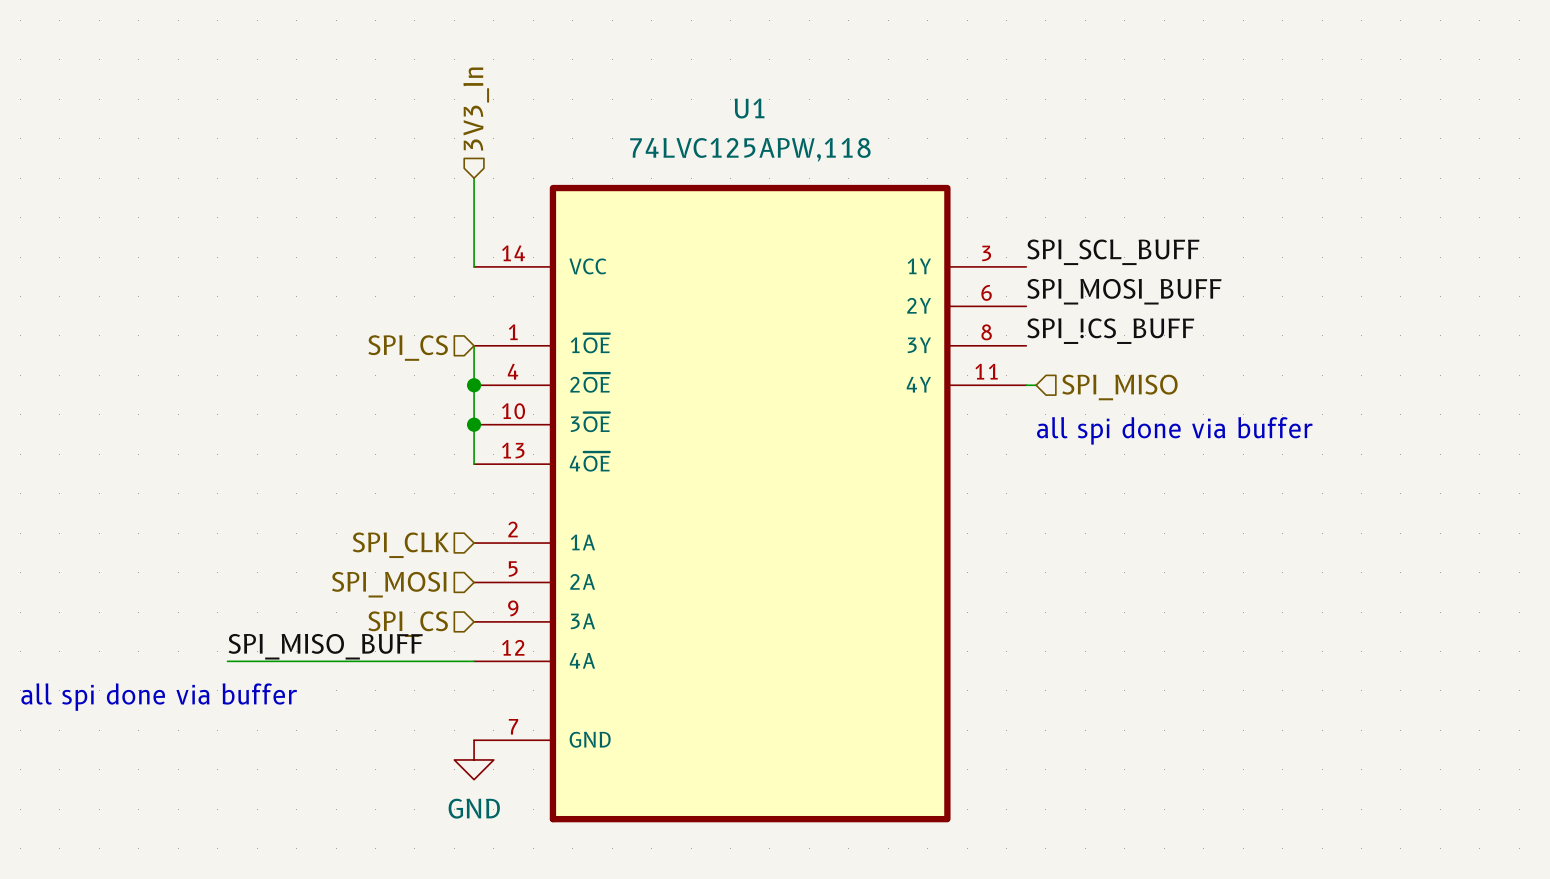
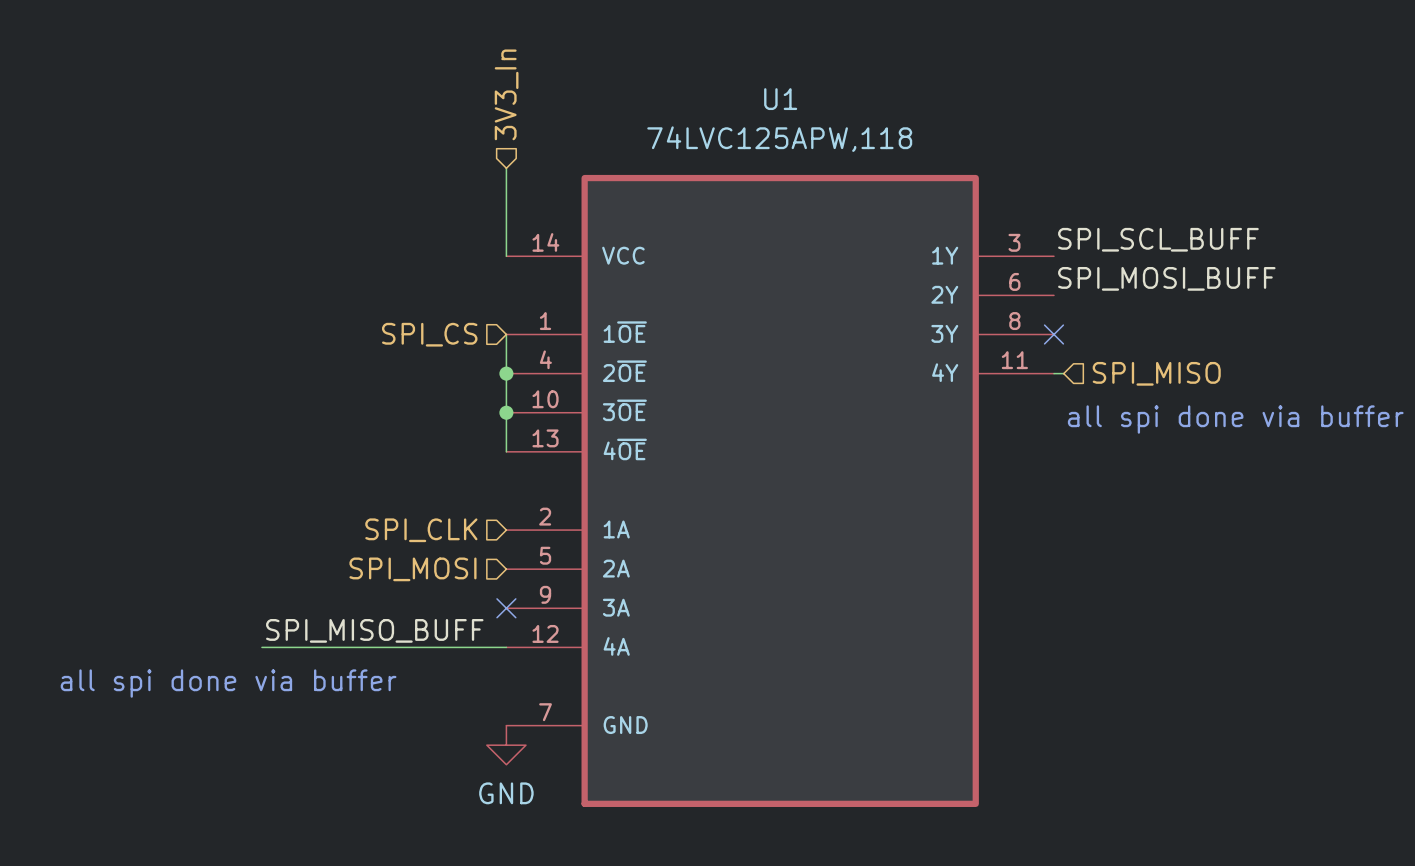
label: SPI_!CS_BUFF (1110, 331) -> none
no-connect mark: none -> (1053, 334)
no-connect mark: none -> (506, 608)
hierarchical label: SPI_CS (408, 624) -> none

